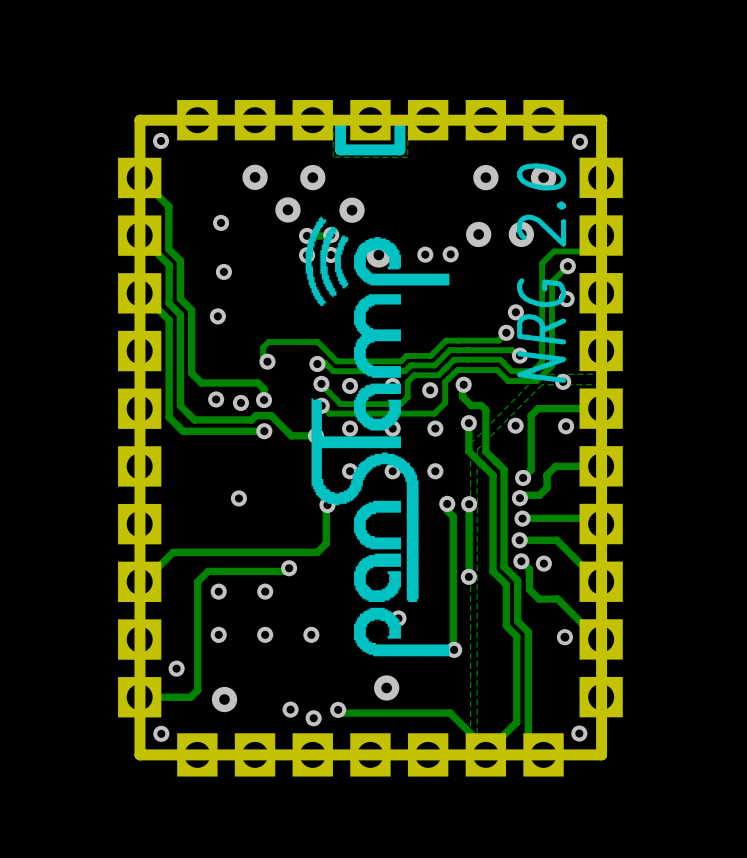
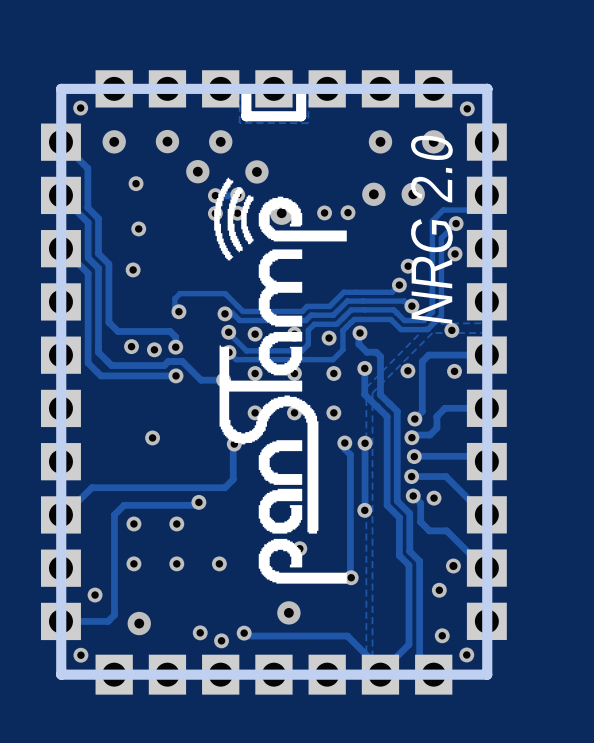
via: none -> (114, 141)
via: none -> (439, 590)
via: none -> (442, 635)

